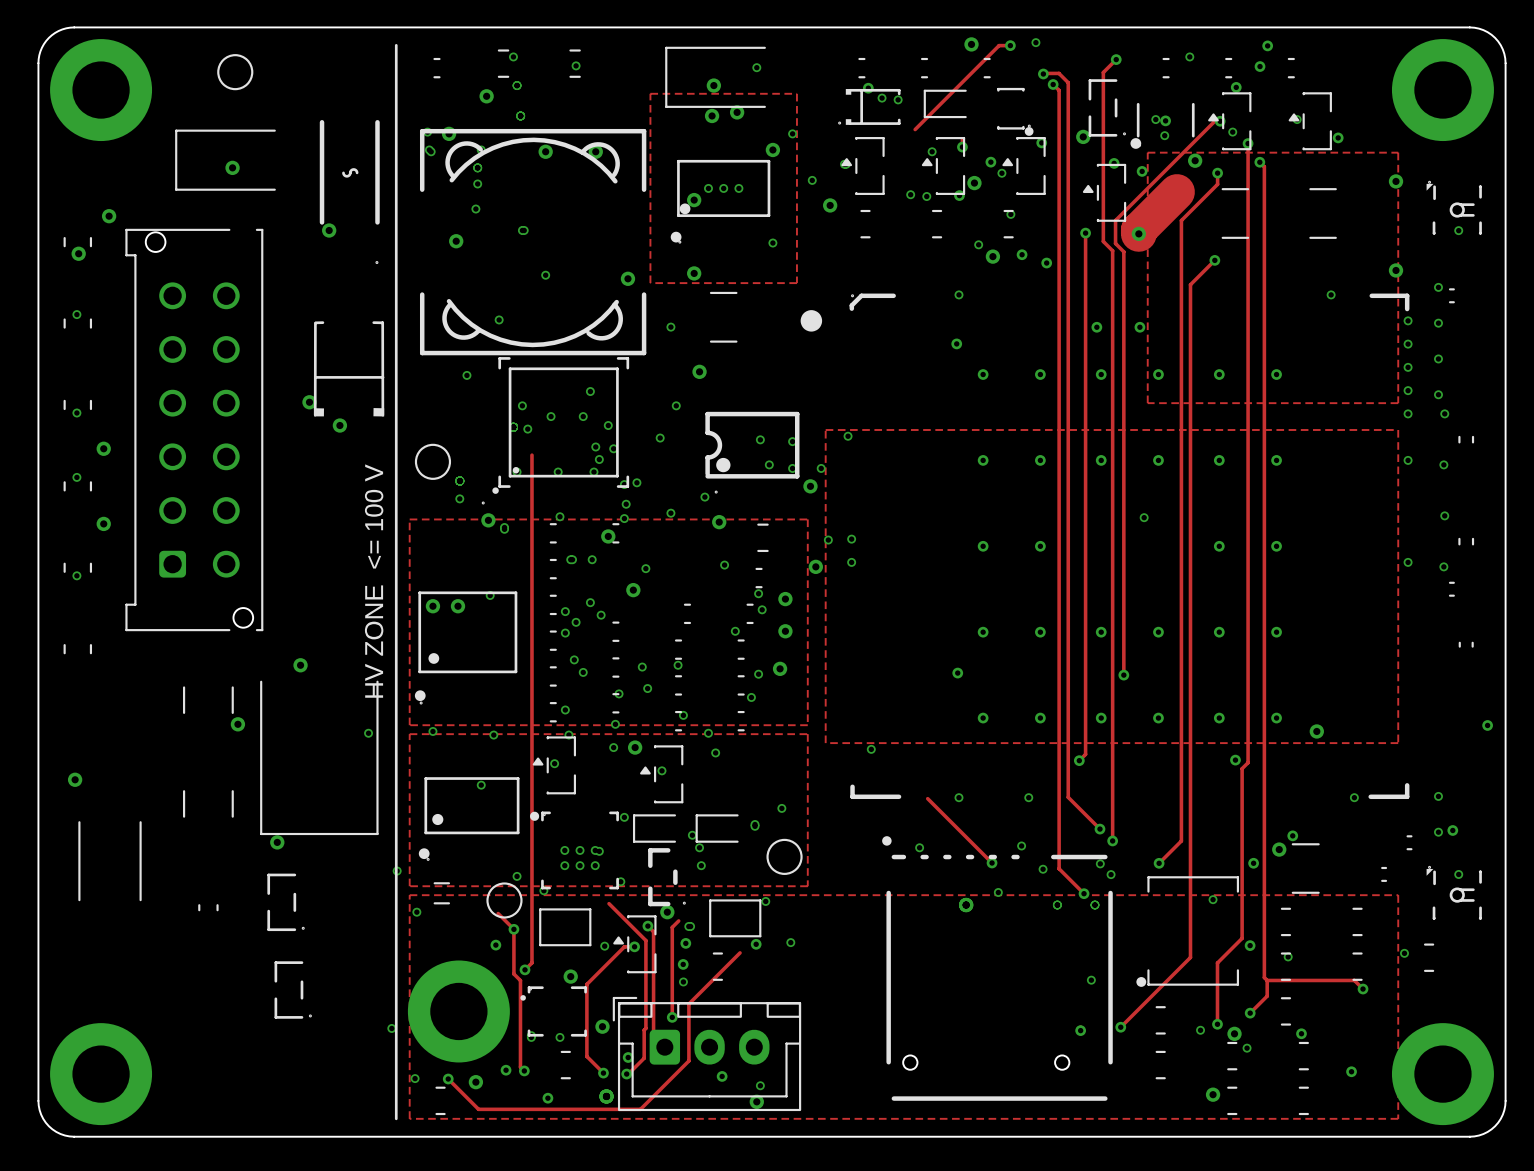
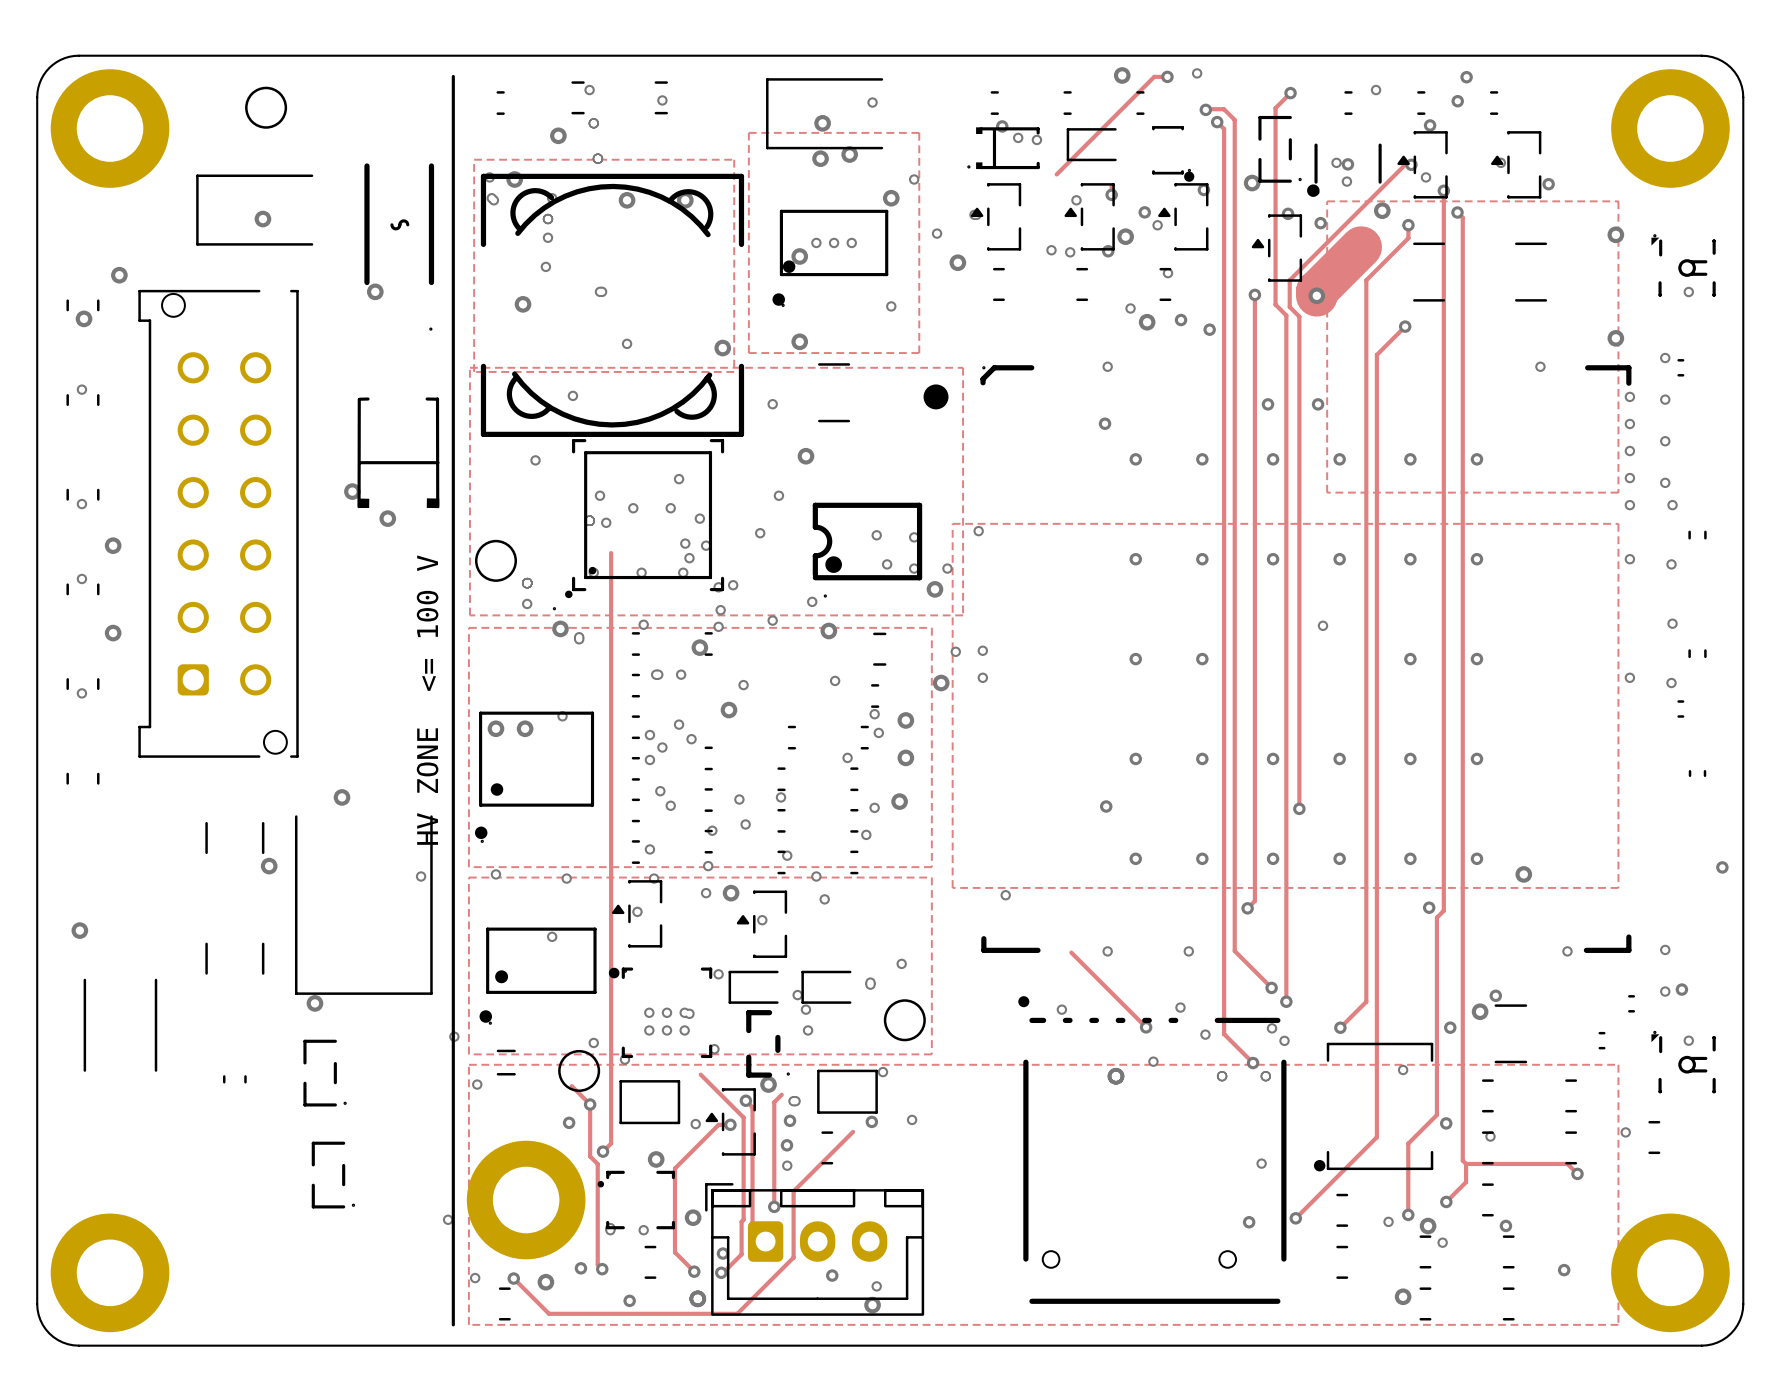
zone outline: none -> (474, 159) (734, 159) (734, 371) (474, 371) (474, 159)
zone outline: none -> (469, 367) (963, 367) (963, 615) (469, 615) (469, 367)

